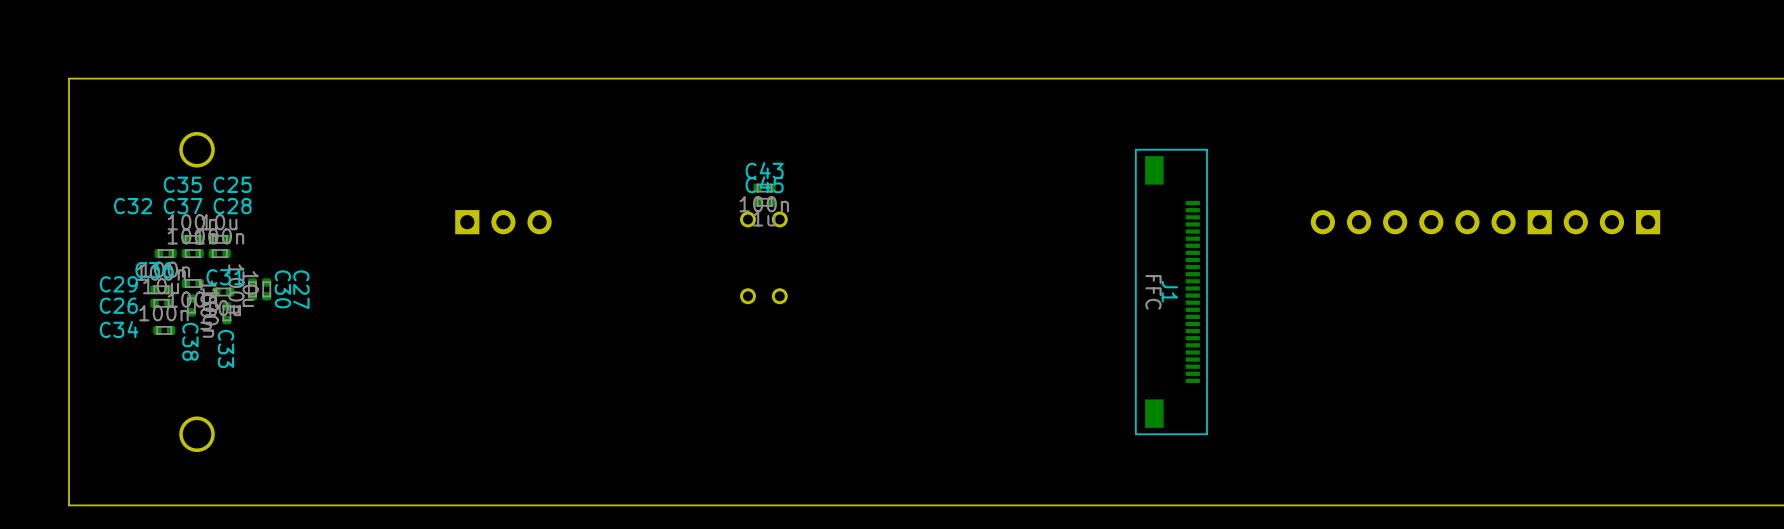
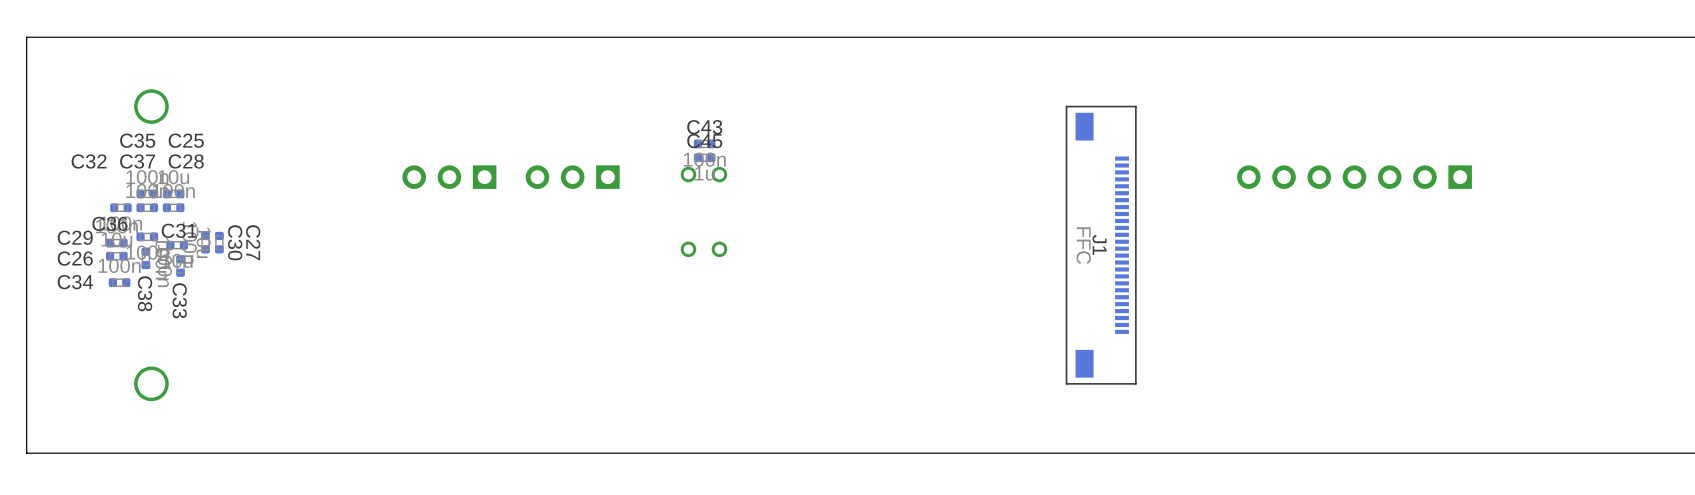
part rotation: 0° (503, 222) -> 180° (449, 177)
part: none -> (572, 177)
part: (1611, 222) -> none

